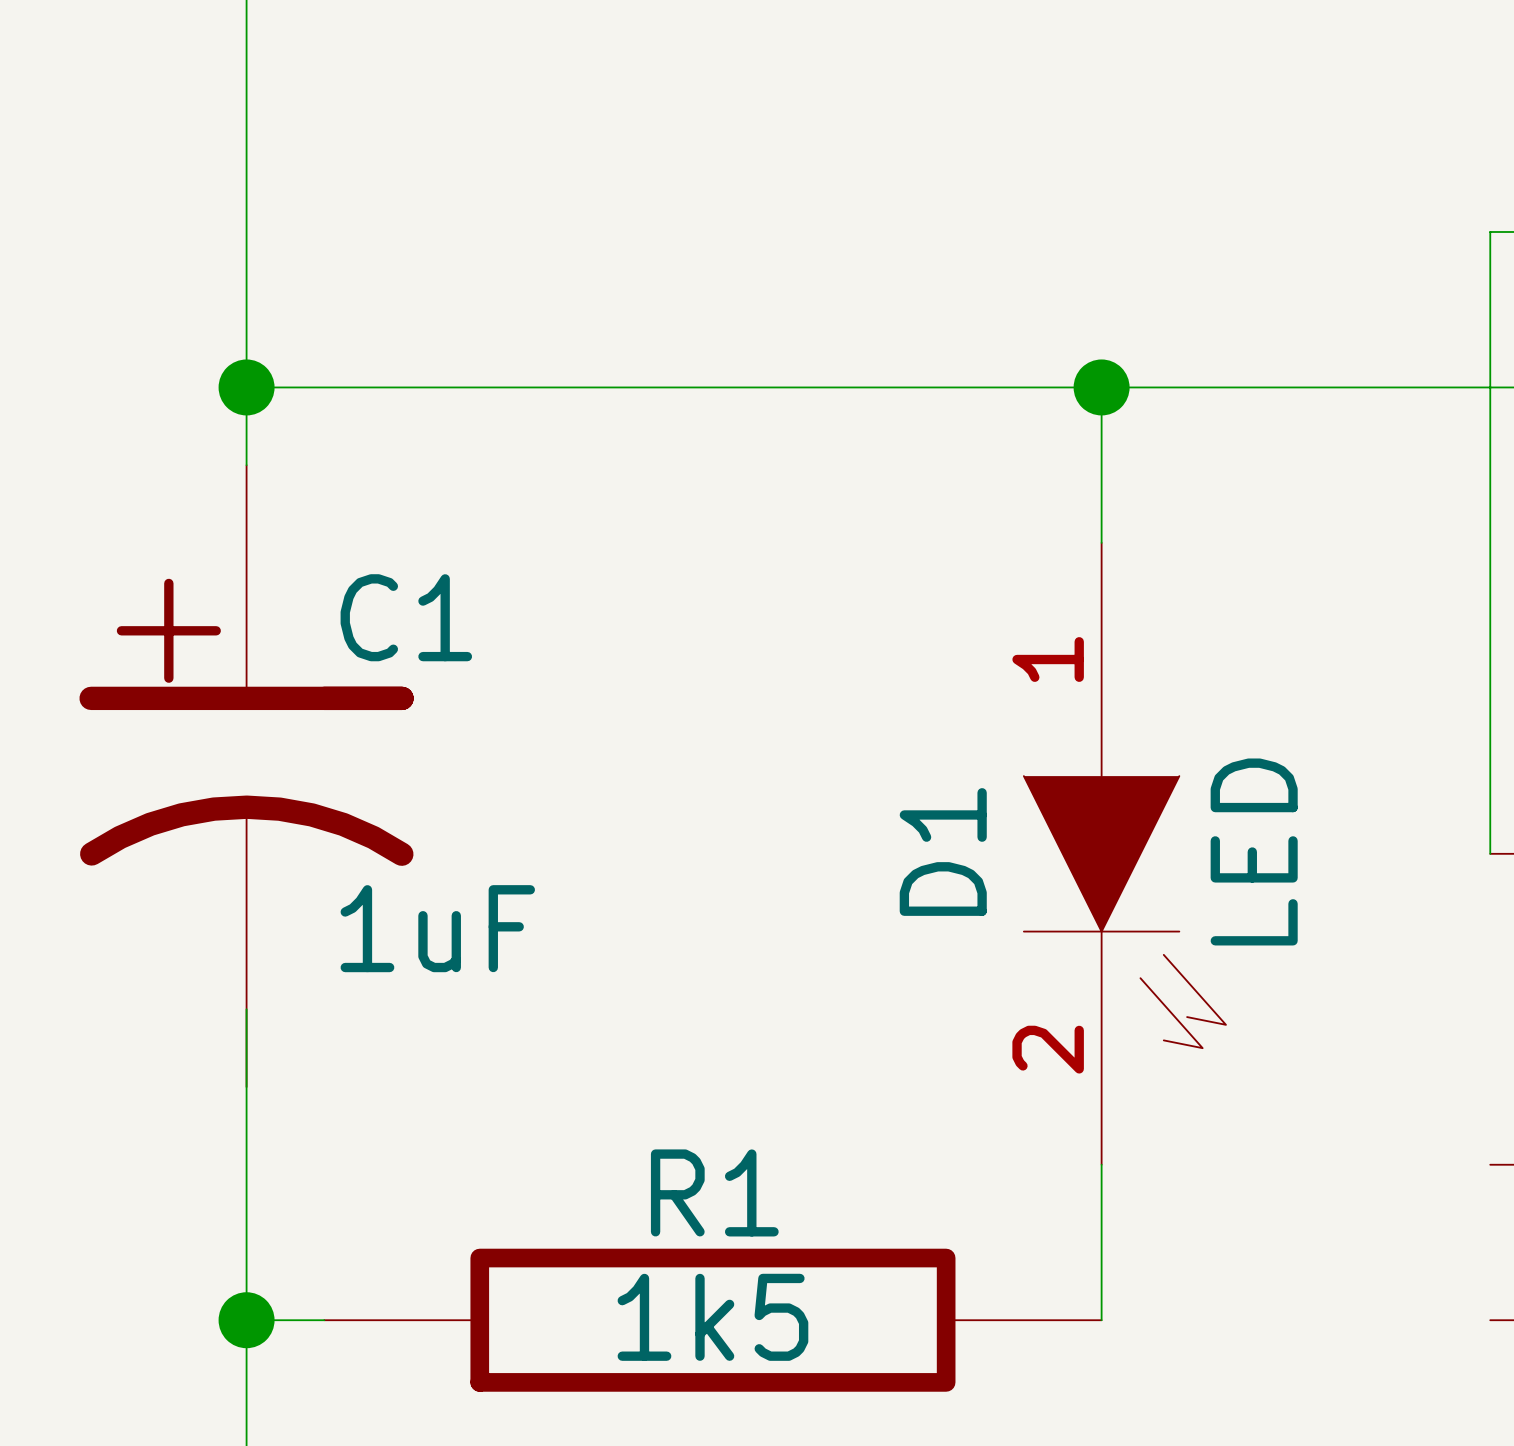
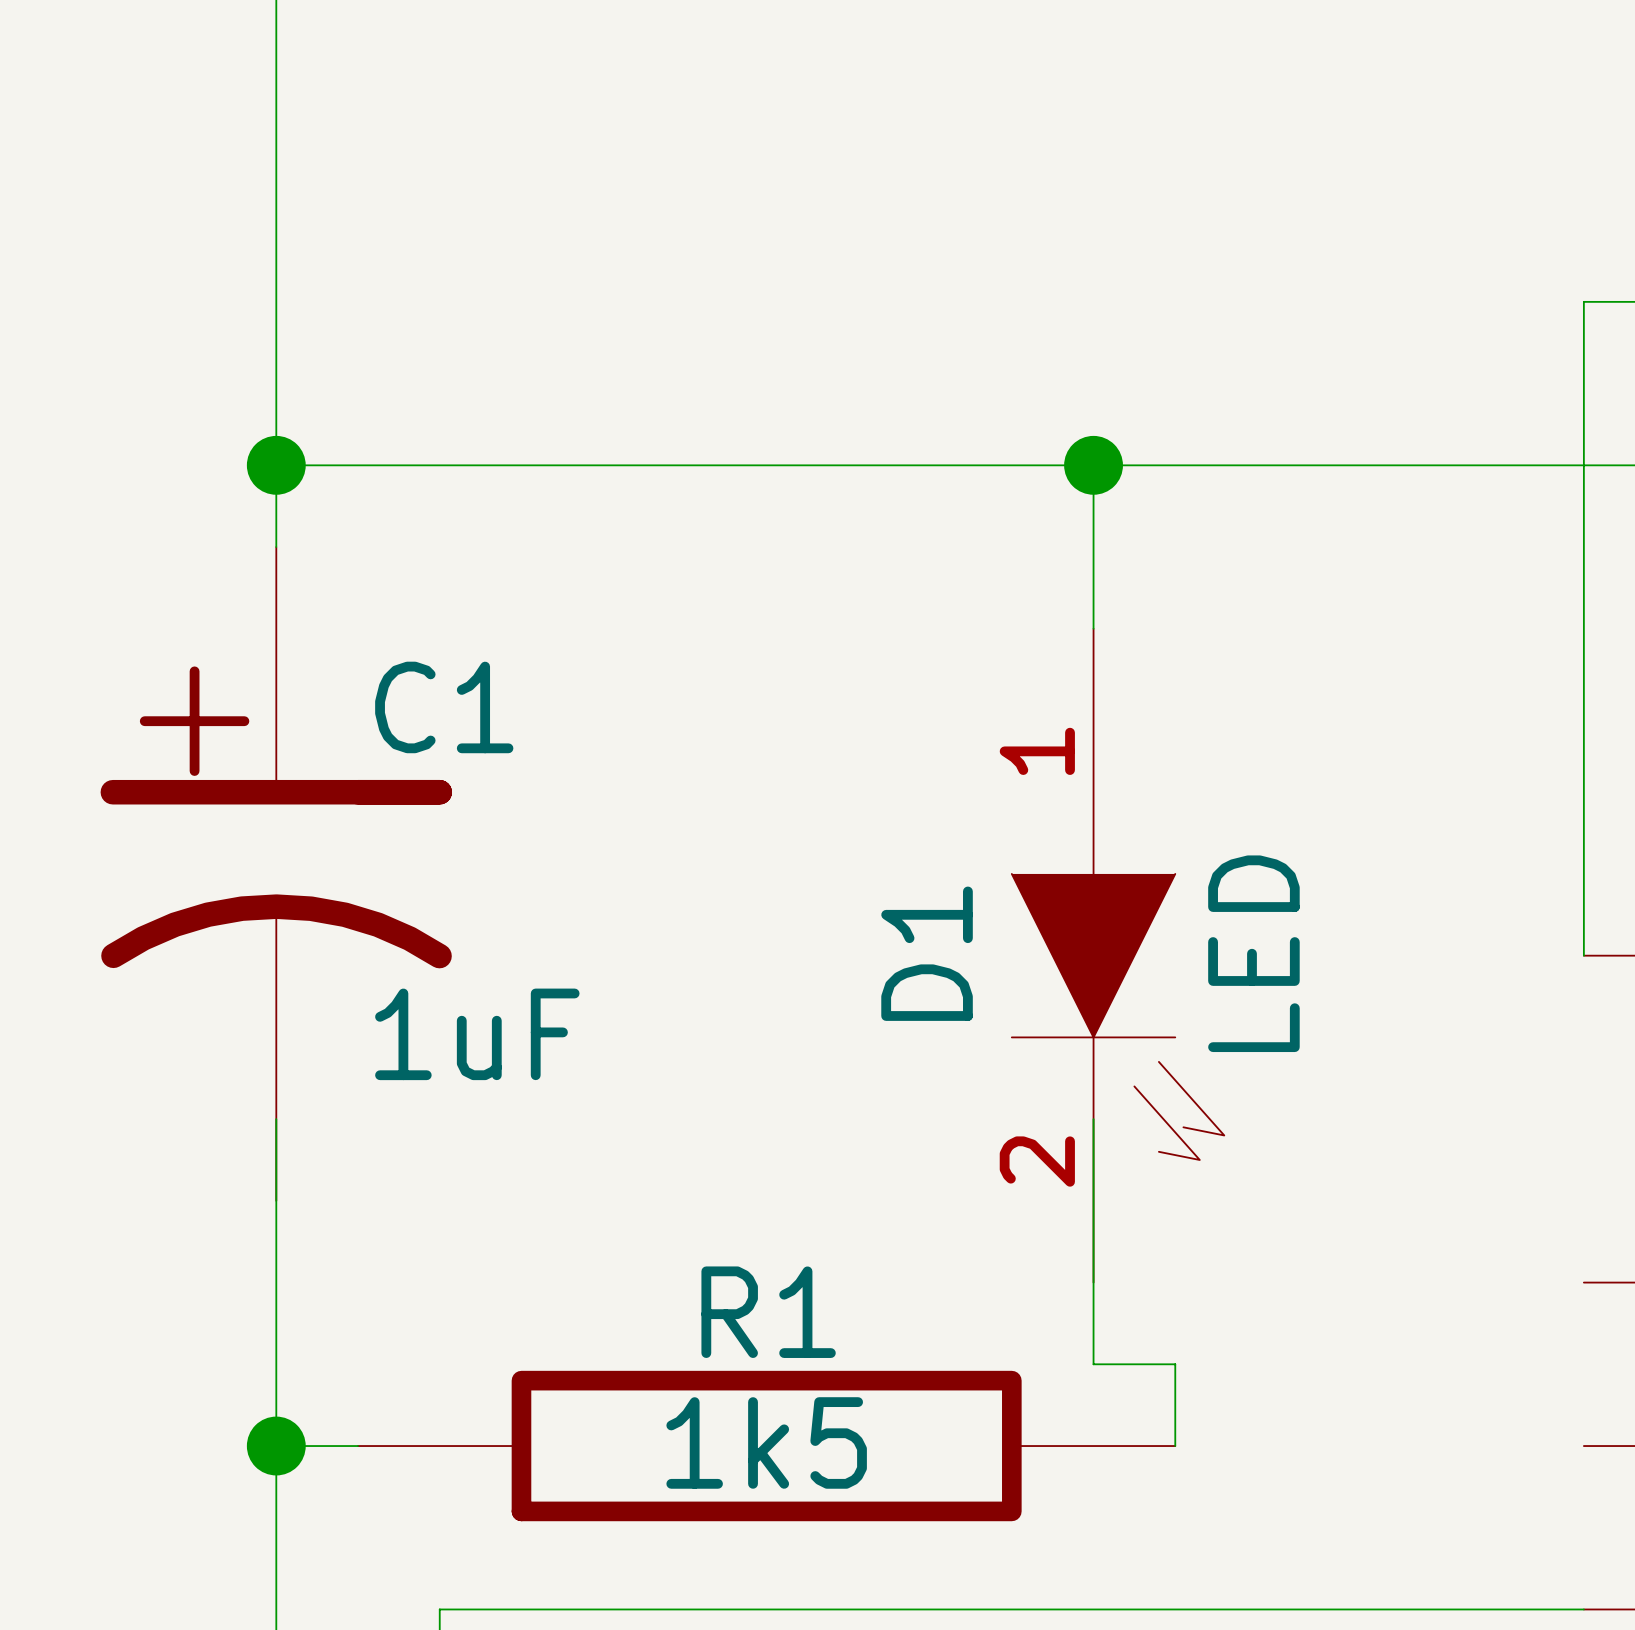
wire: (1101, 387) (1101, 542) -> (1093, 465) (1093, 628)
junction position: (1101, 387) -> (1093, 465)
D1 position: (1124, 853) -> (1118, 955)
wire: (1101, 1164) (1101, 1242) -> (1093, 1119) (1093, 1364) (1175, 1364)

